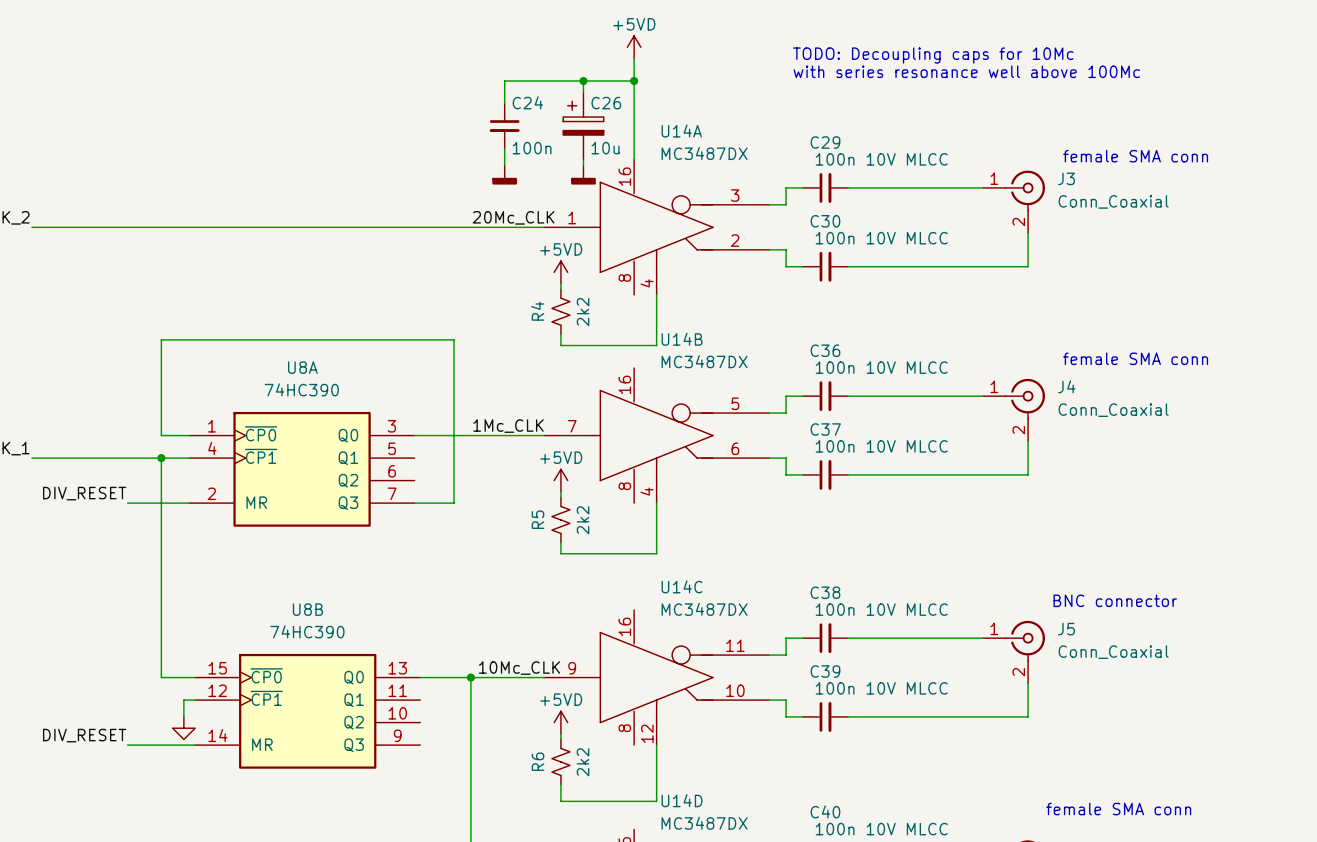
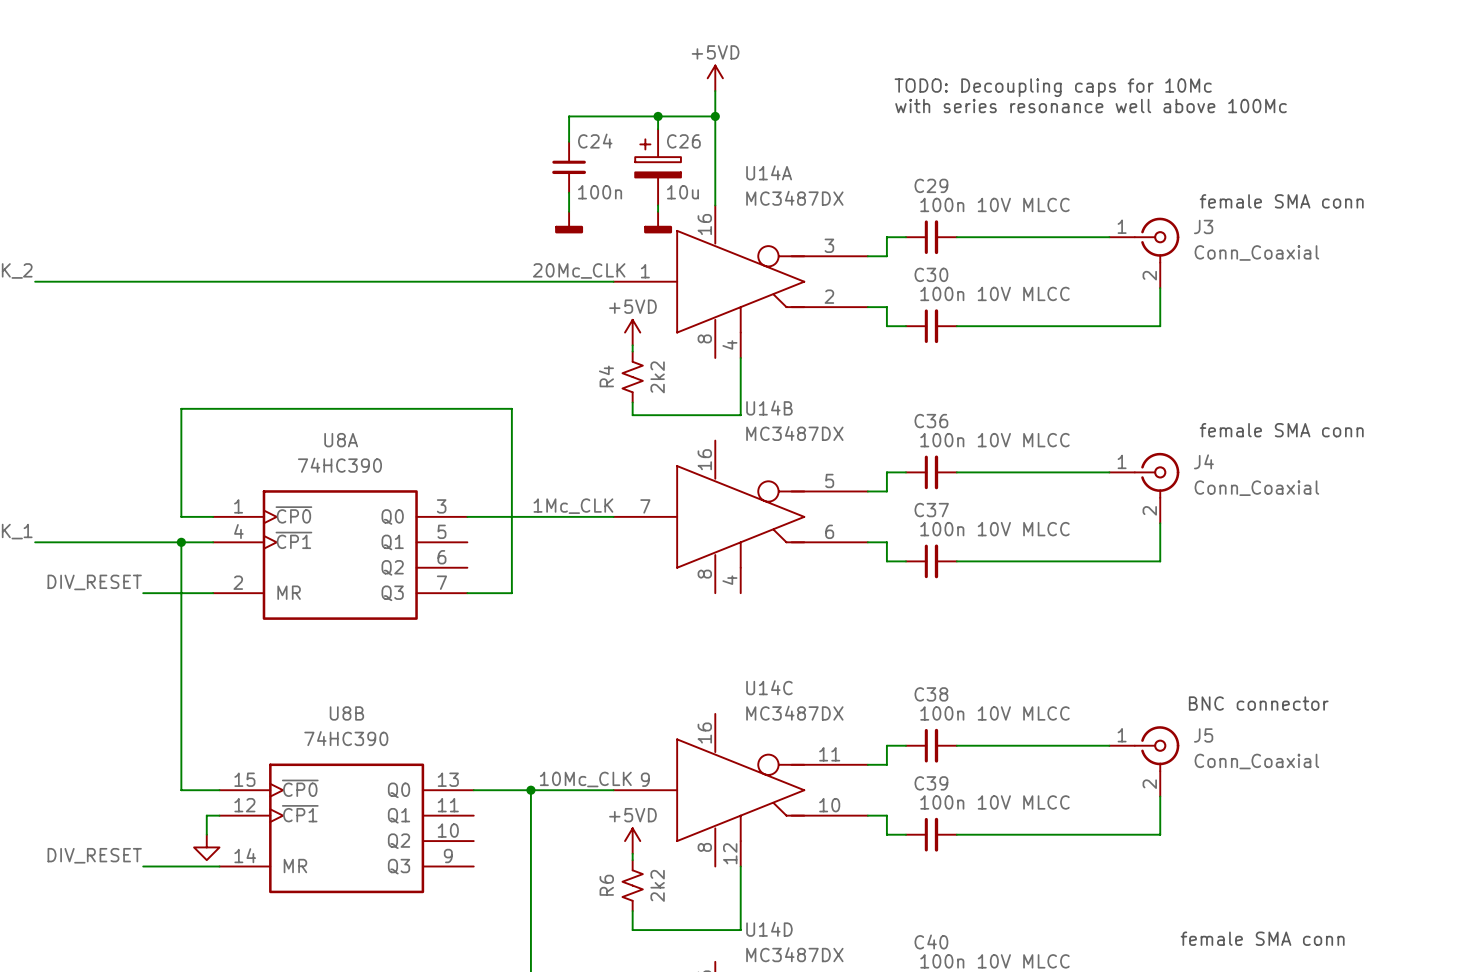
power symbol: +5VD (560, 480) -> none
wire: (560, 491) (560, 497) -> none
wire: (656, 503) (656, 553) (560, 553) (560, 542) -> none
R5: 2k2 (560, 519) -> none

